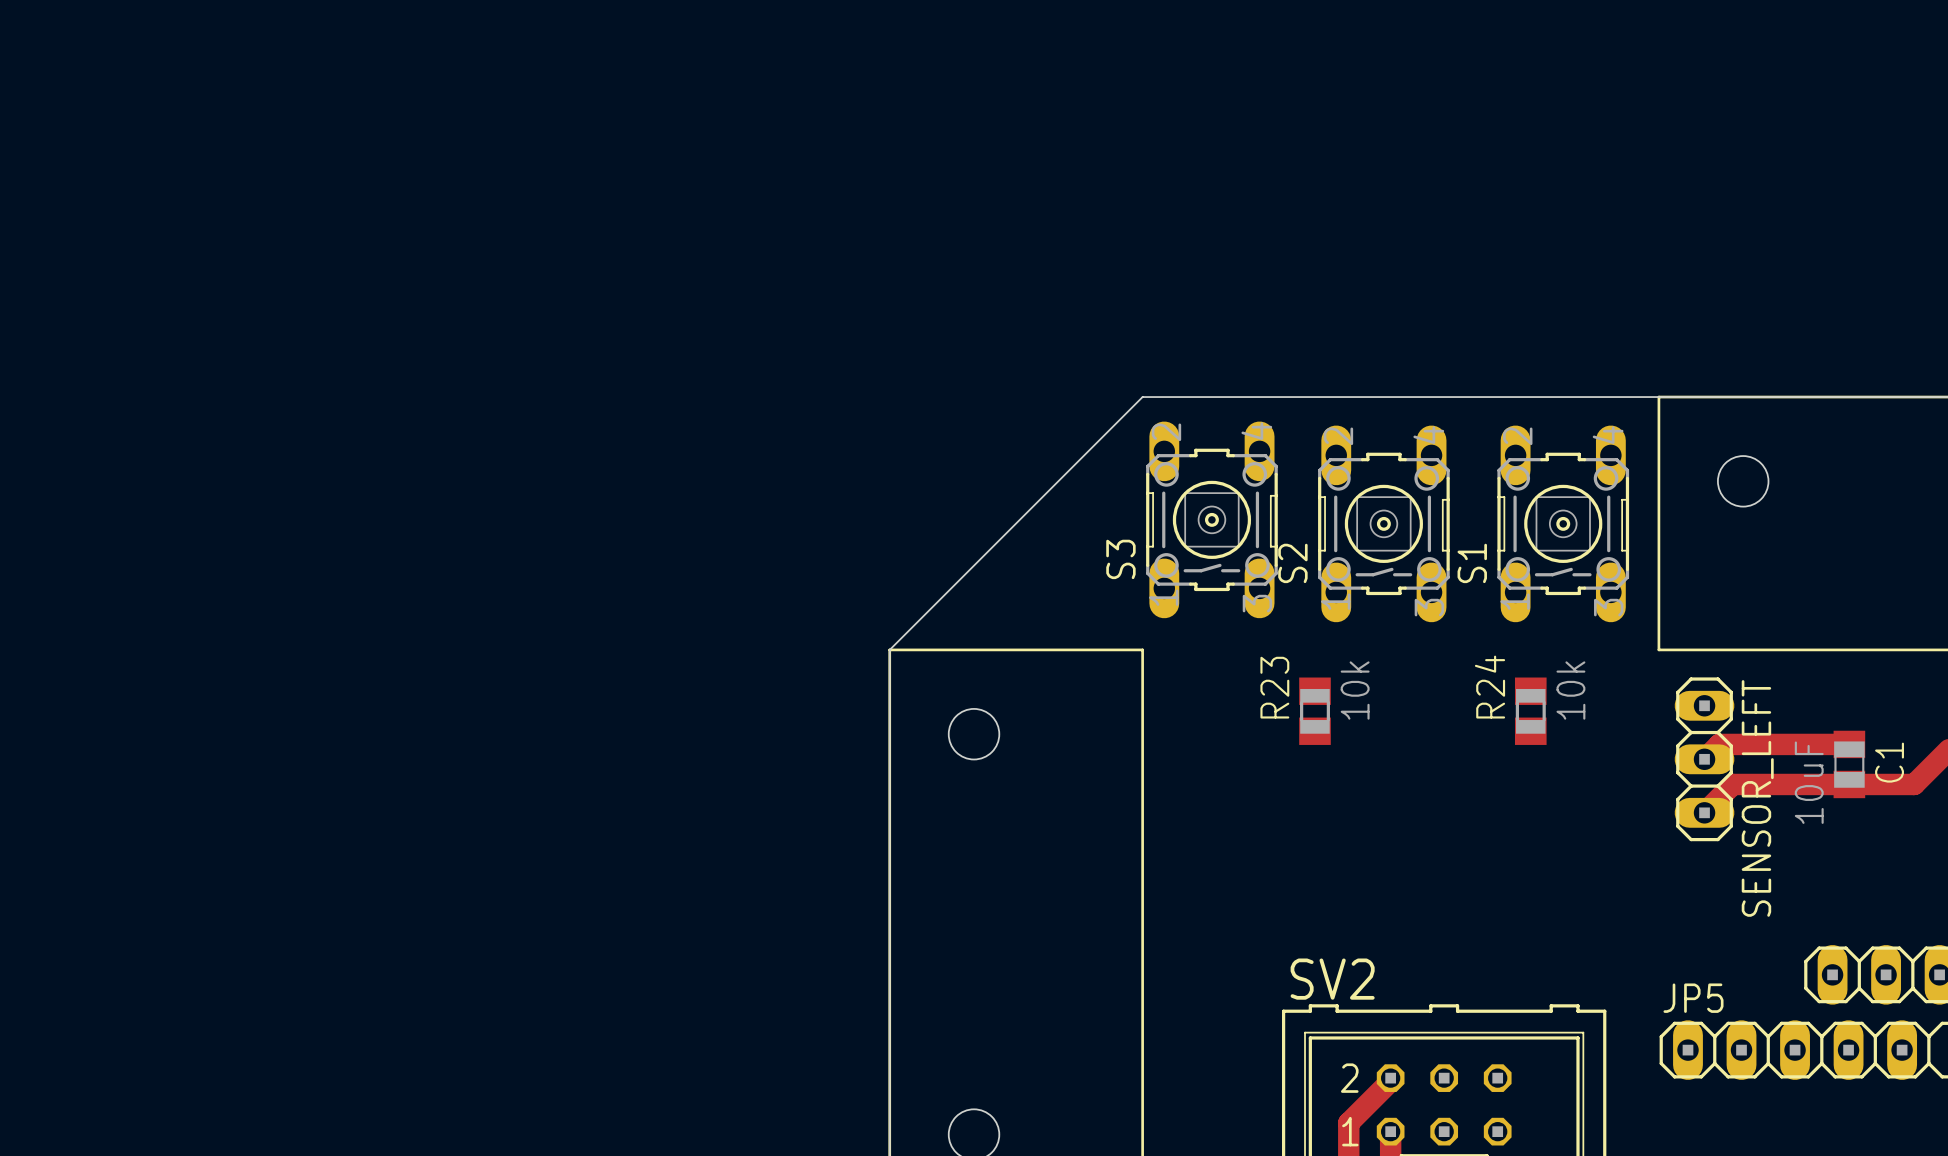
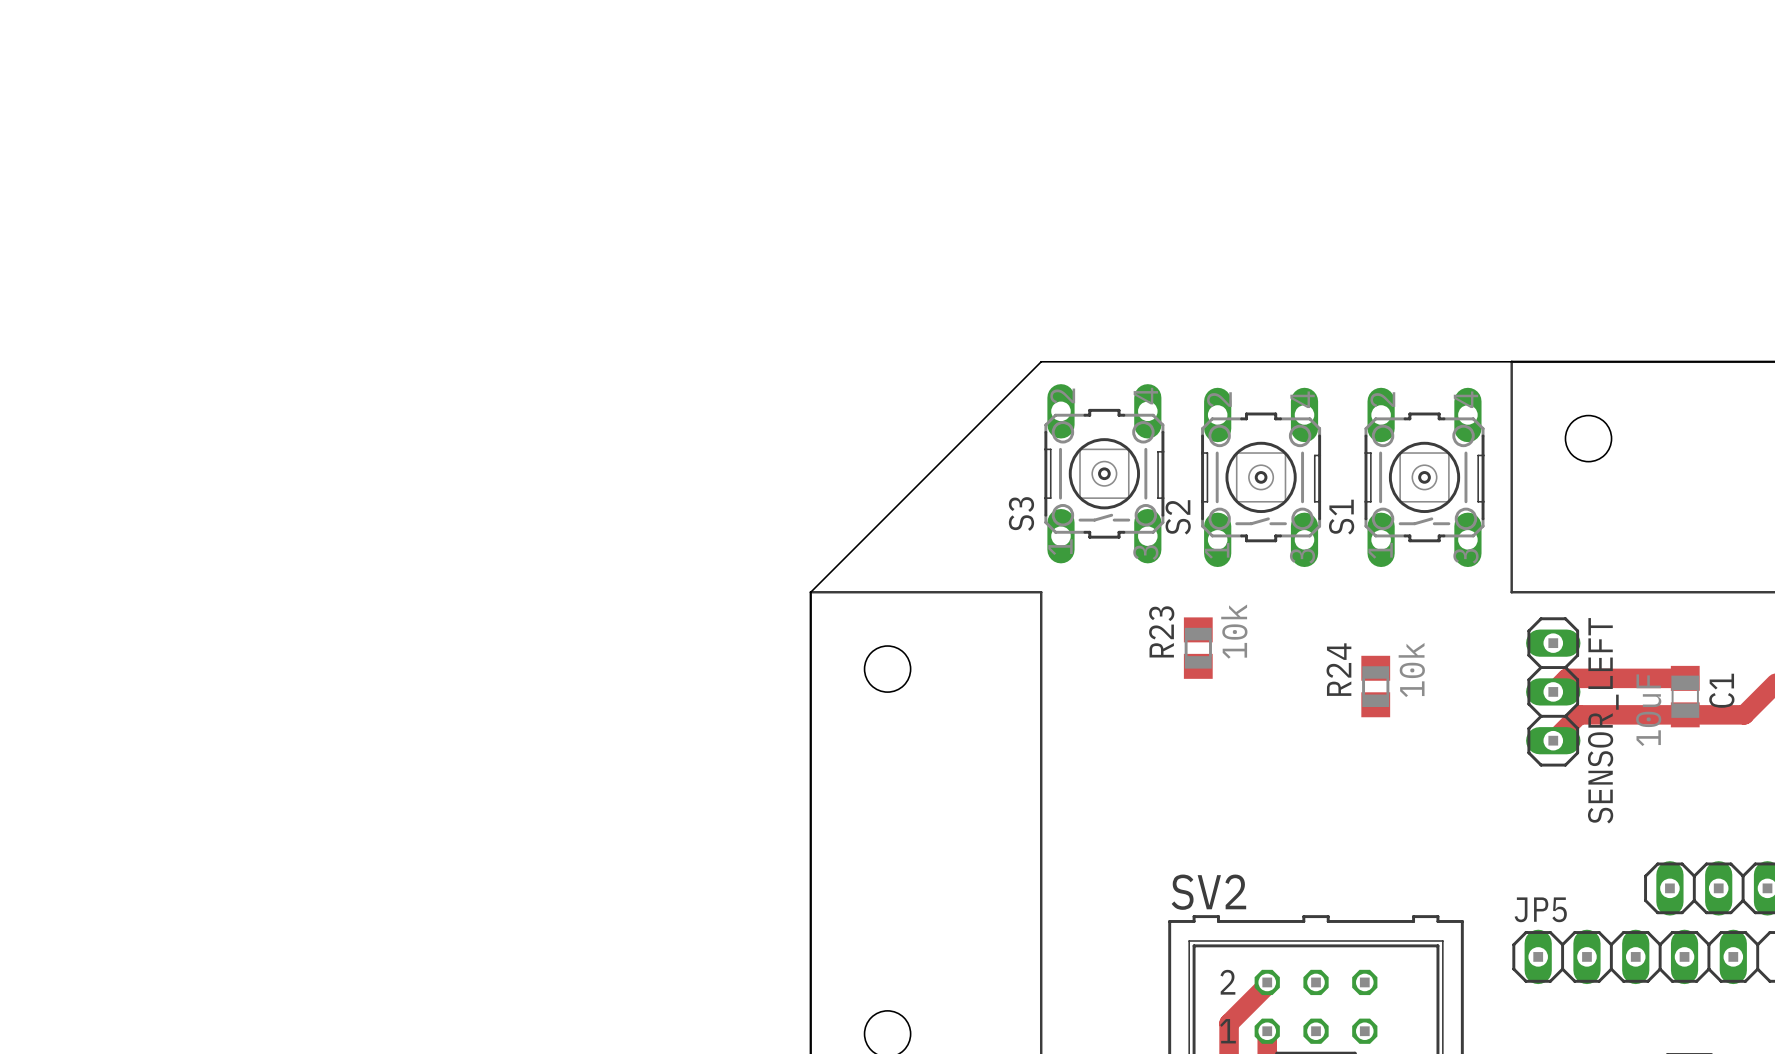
R24 position: (1530, 711) -> (1375, 686)

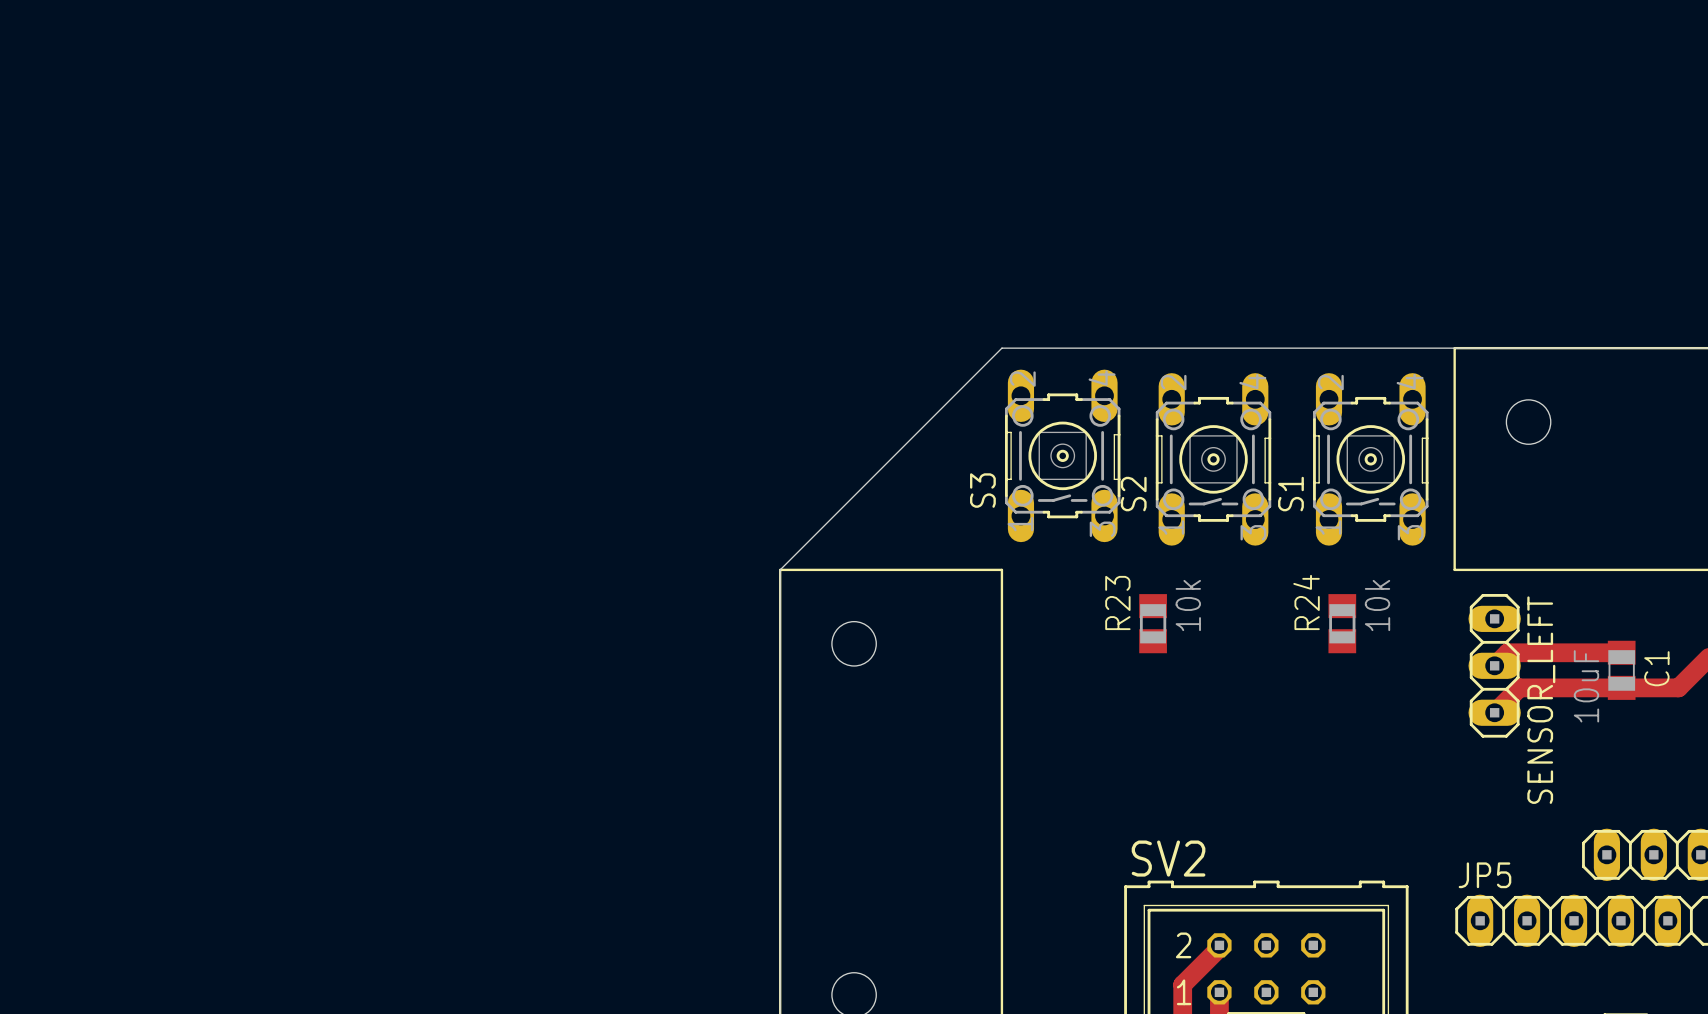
R24 position: (1375, 686) -> (1342, 623)

